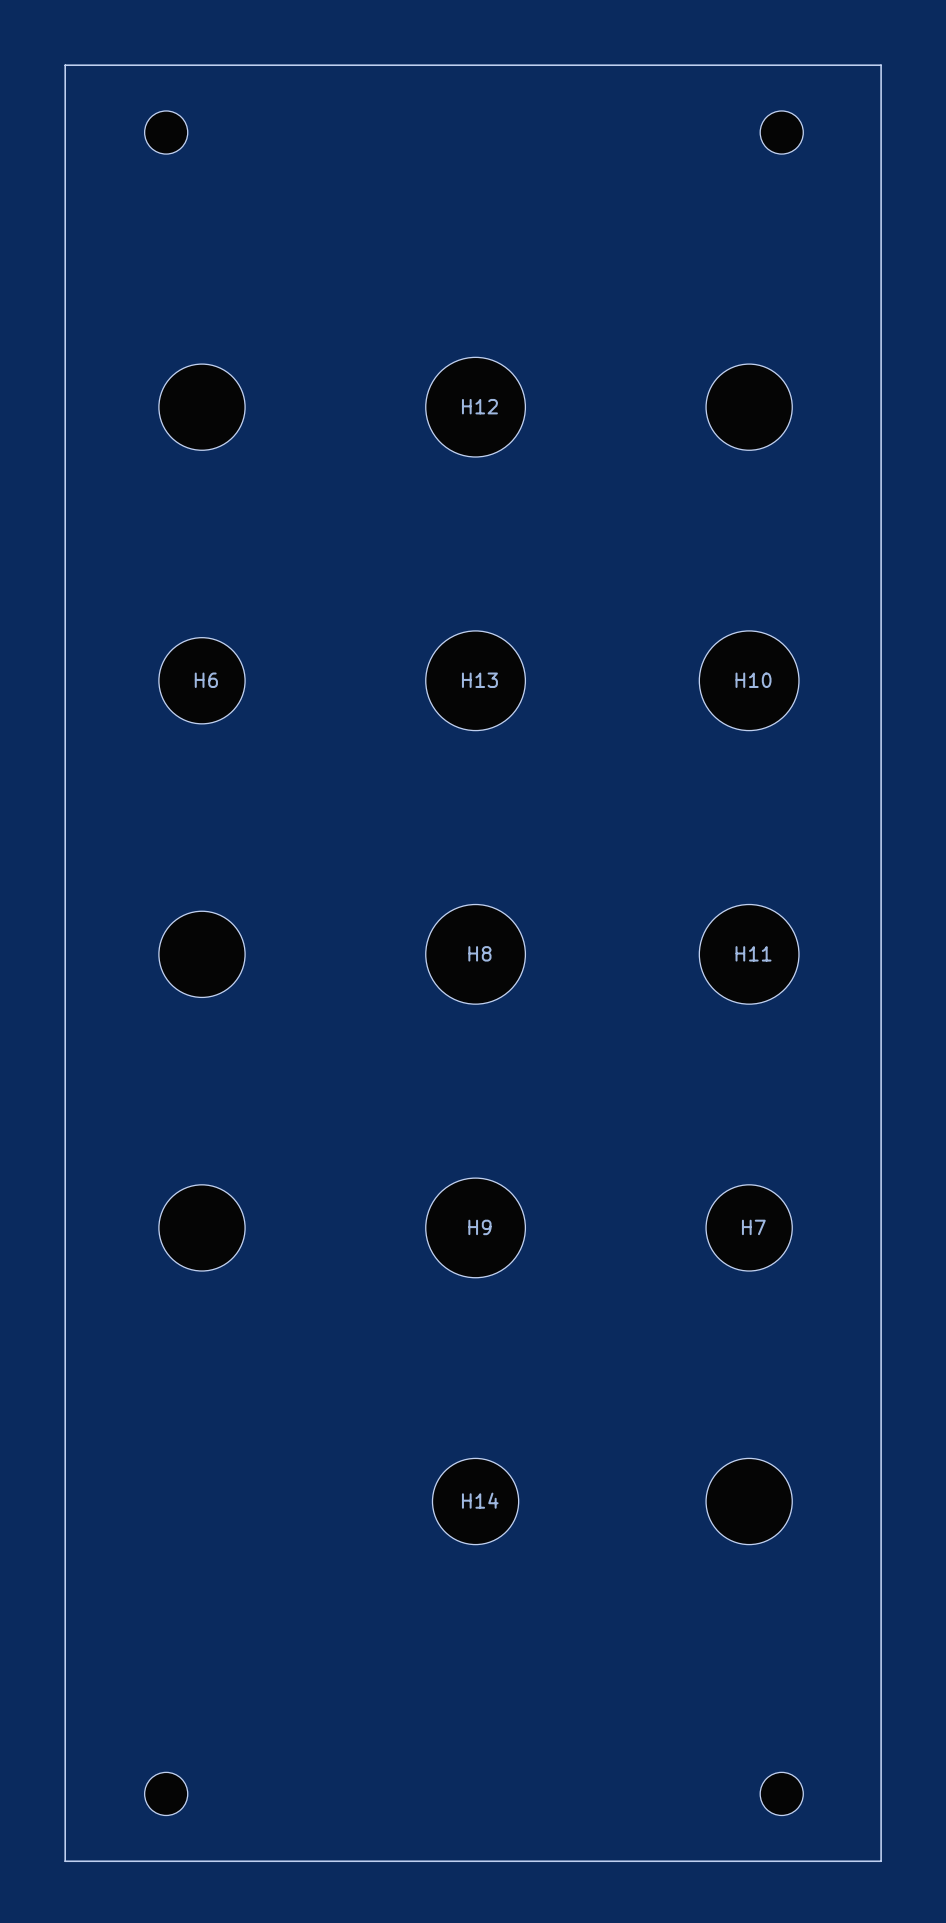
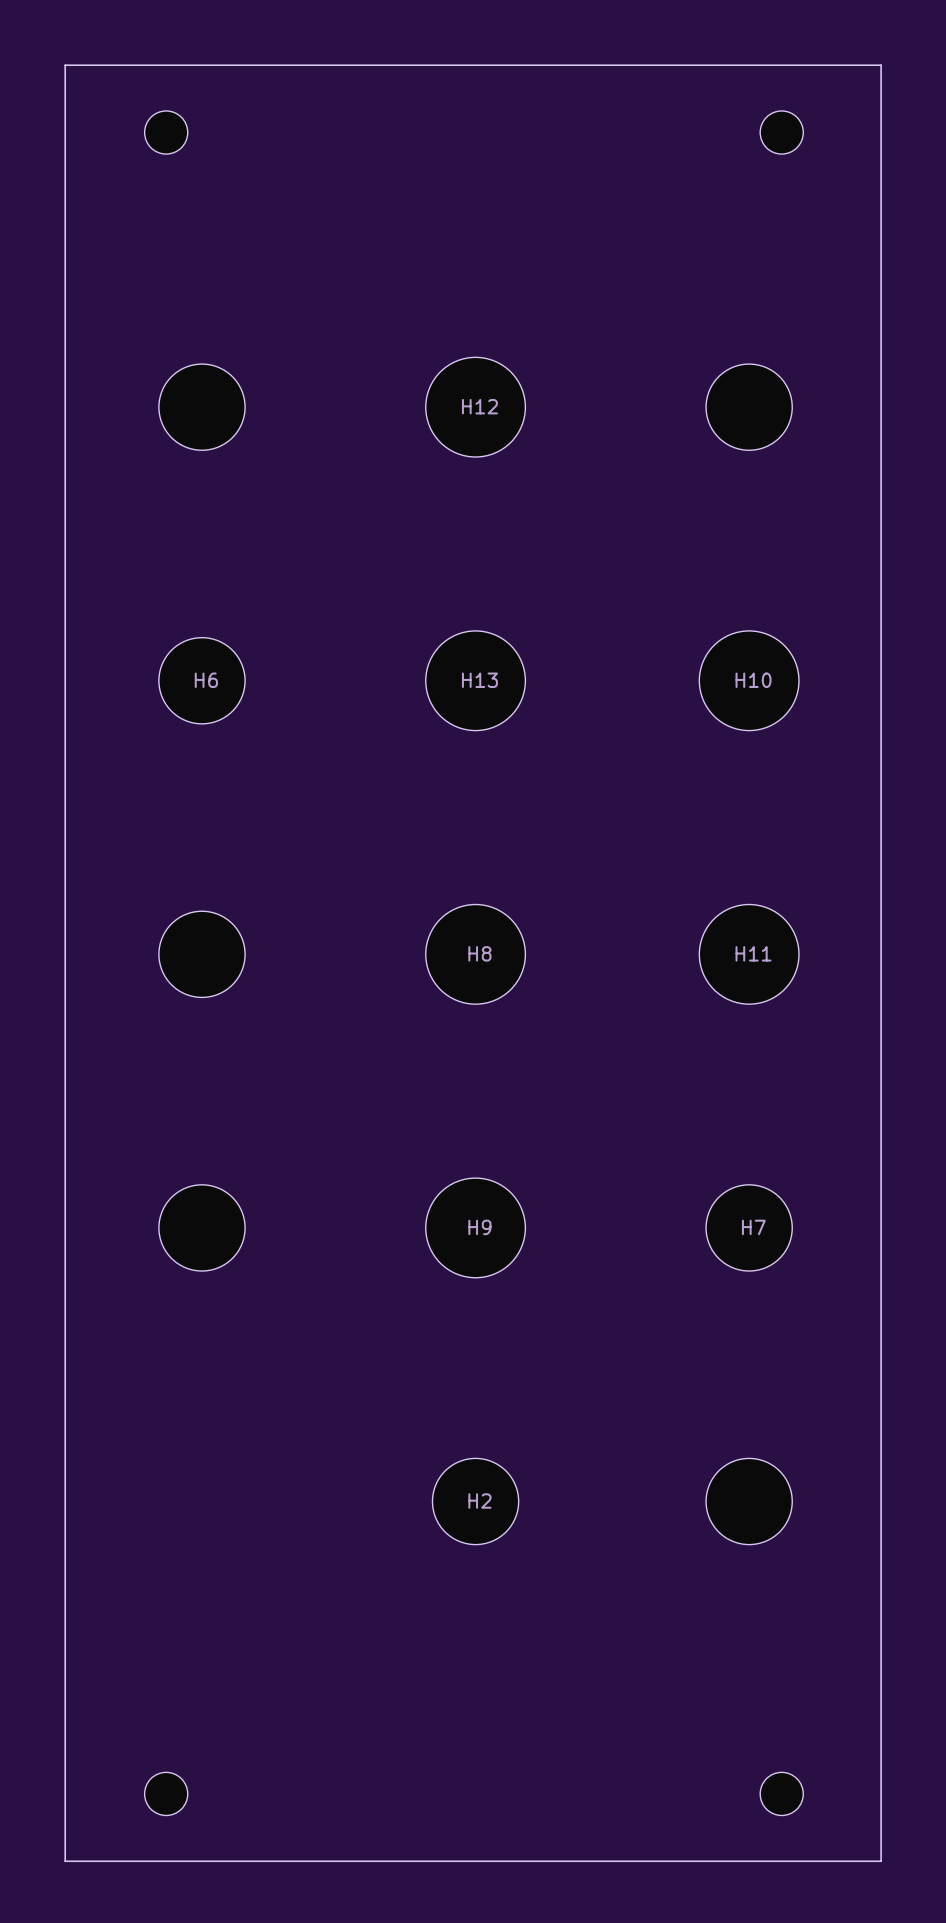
H14 name: H14 (480, 1500) -> H2 (479, 1501)

